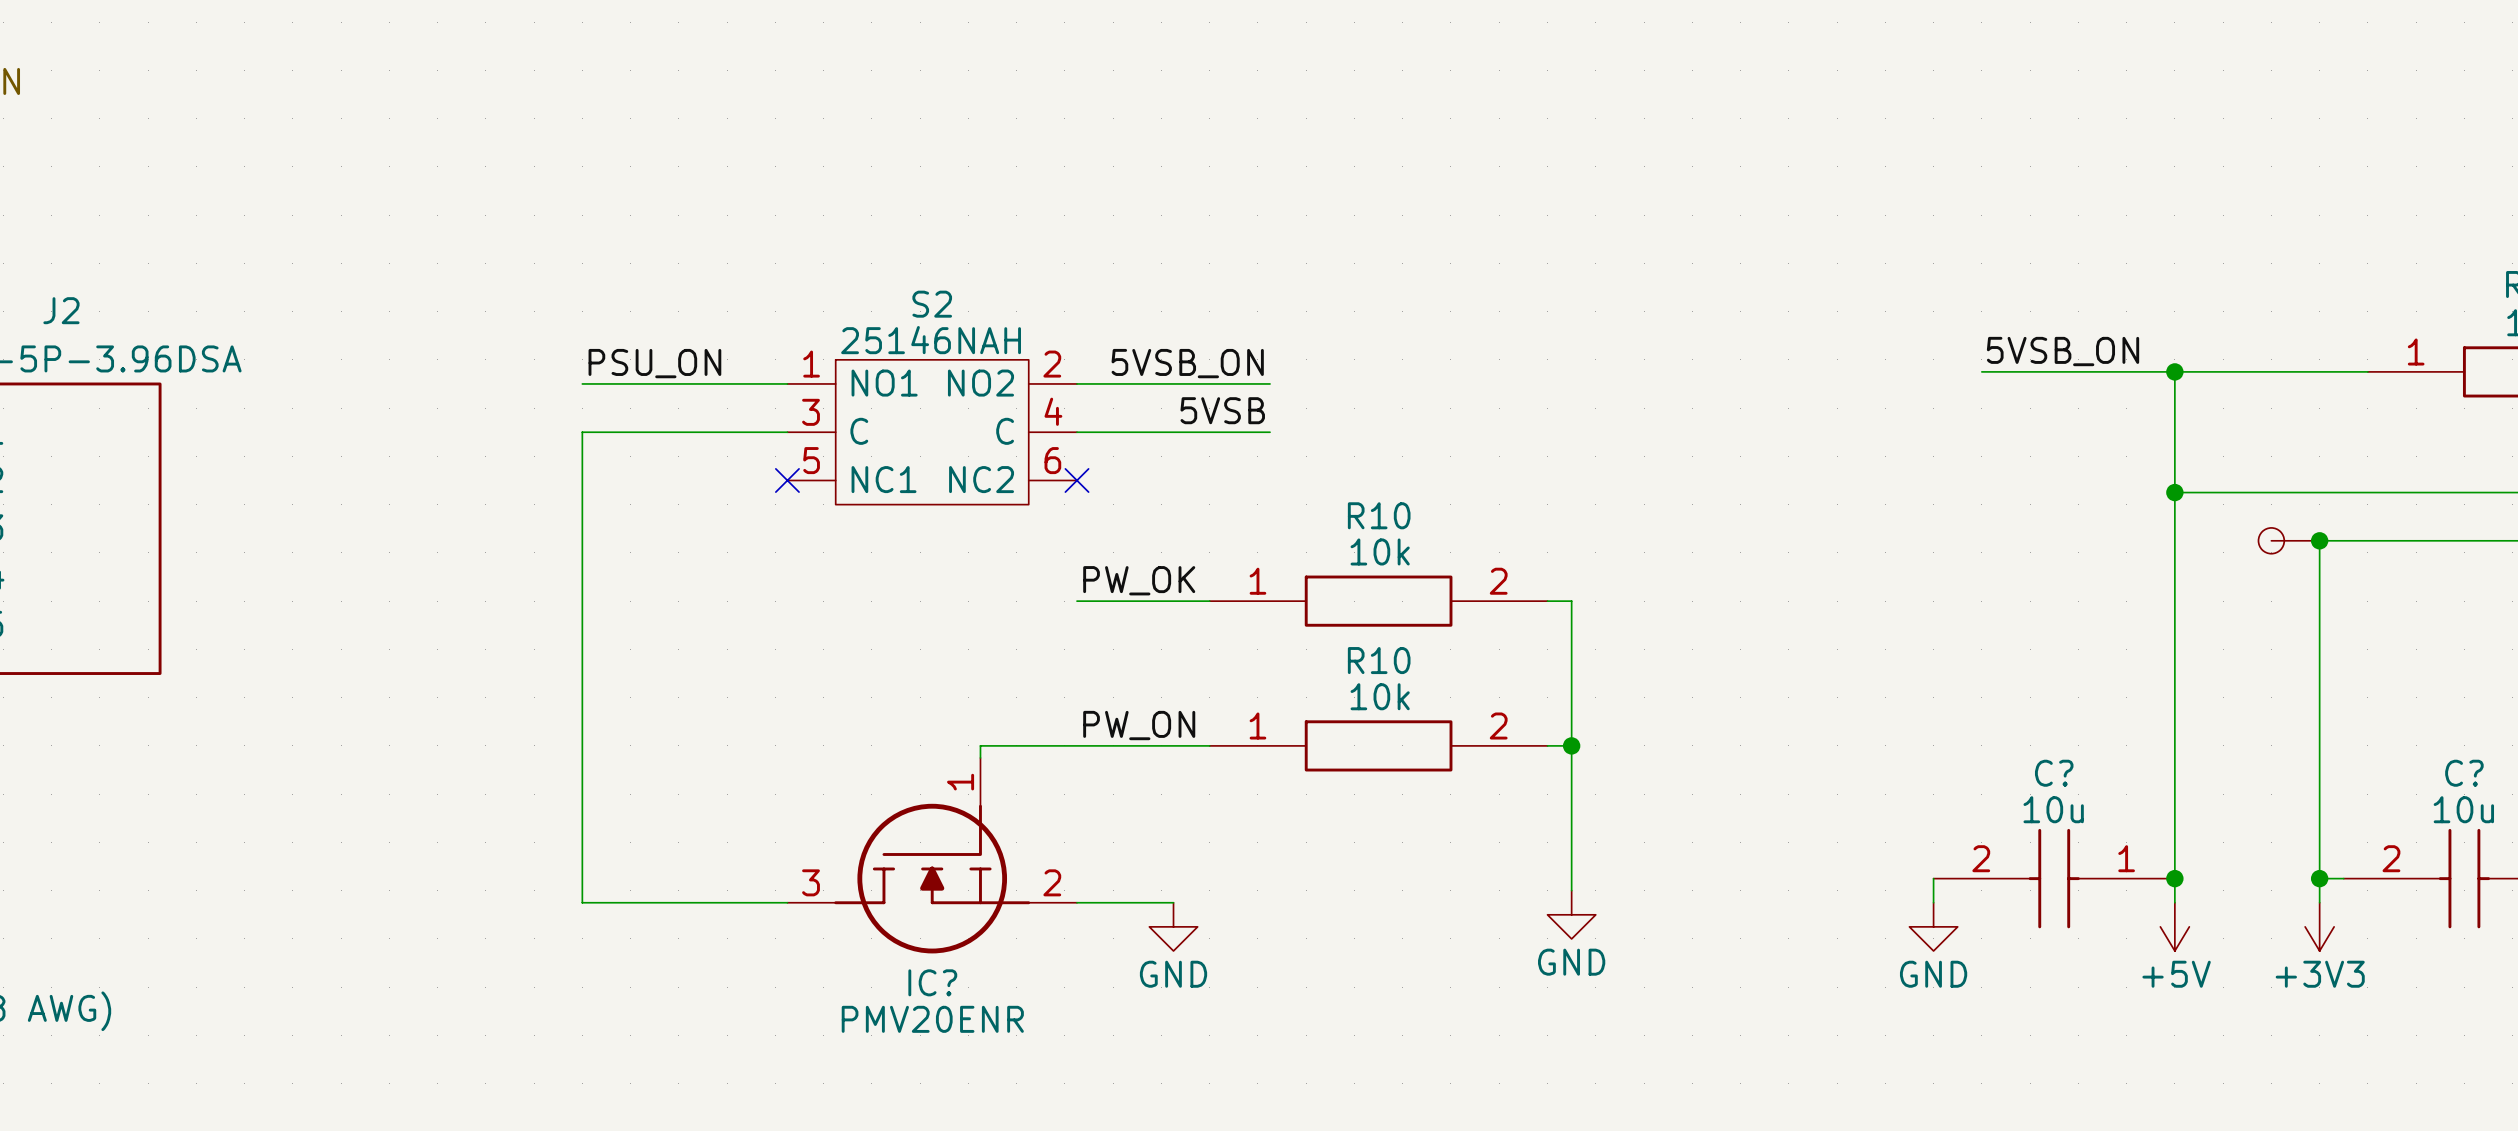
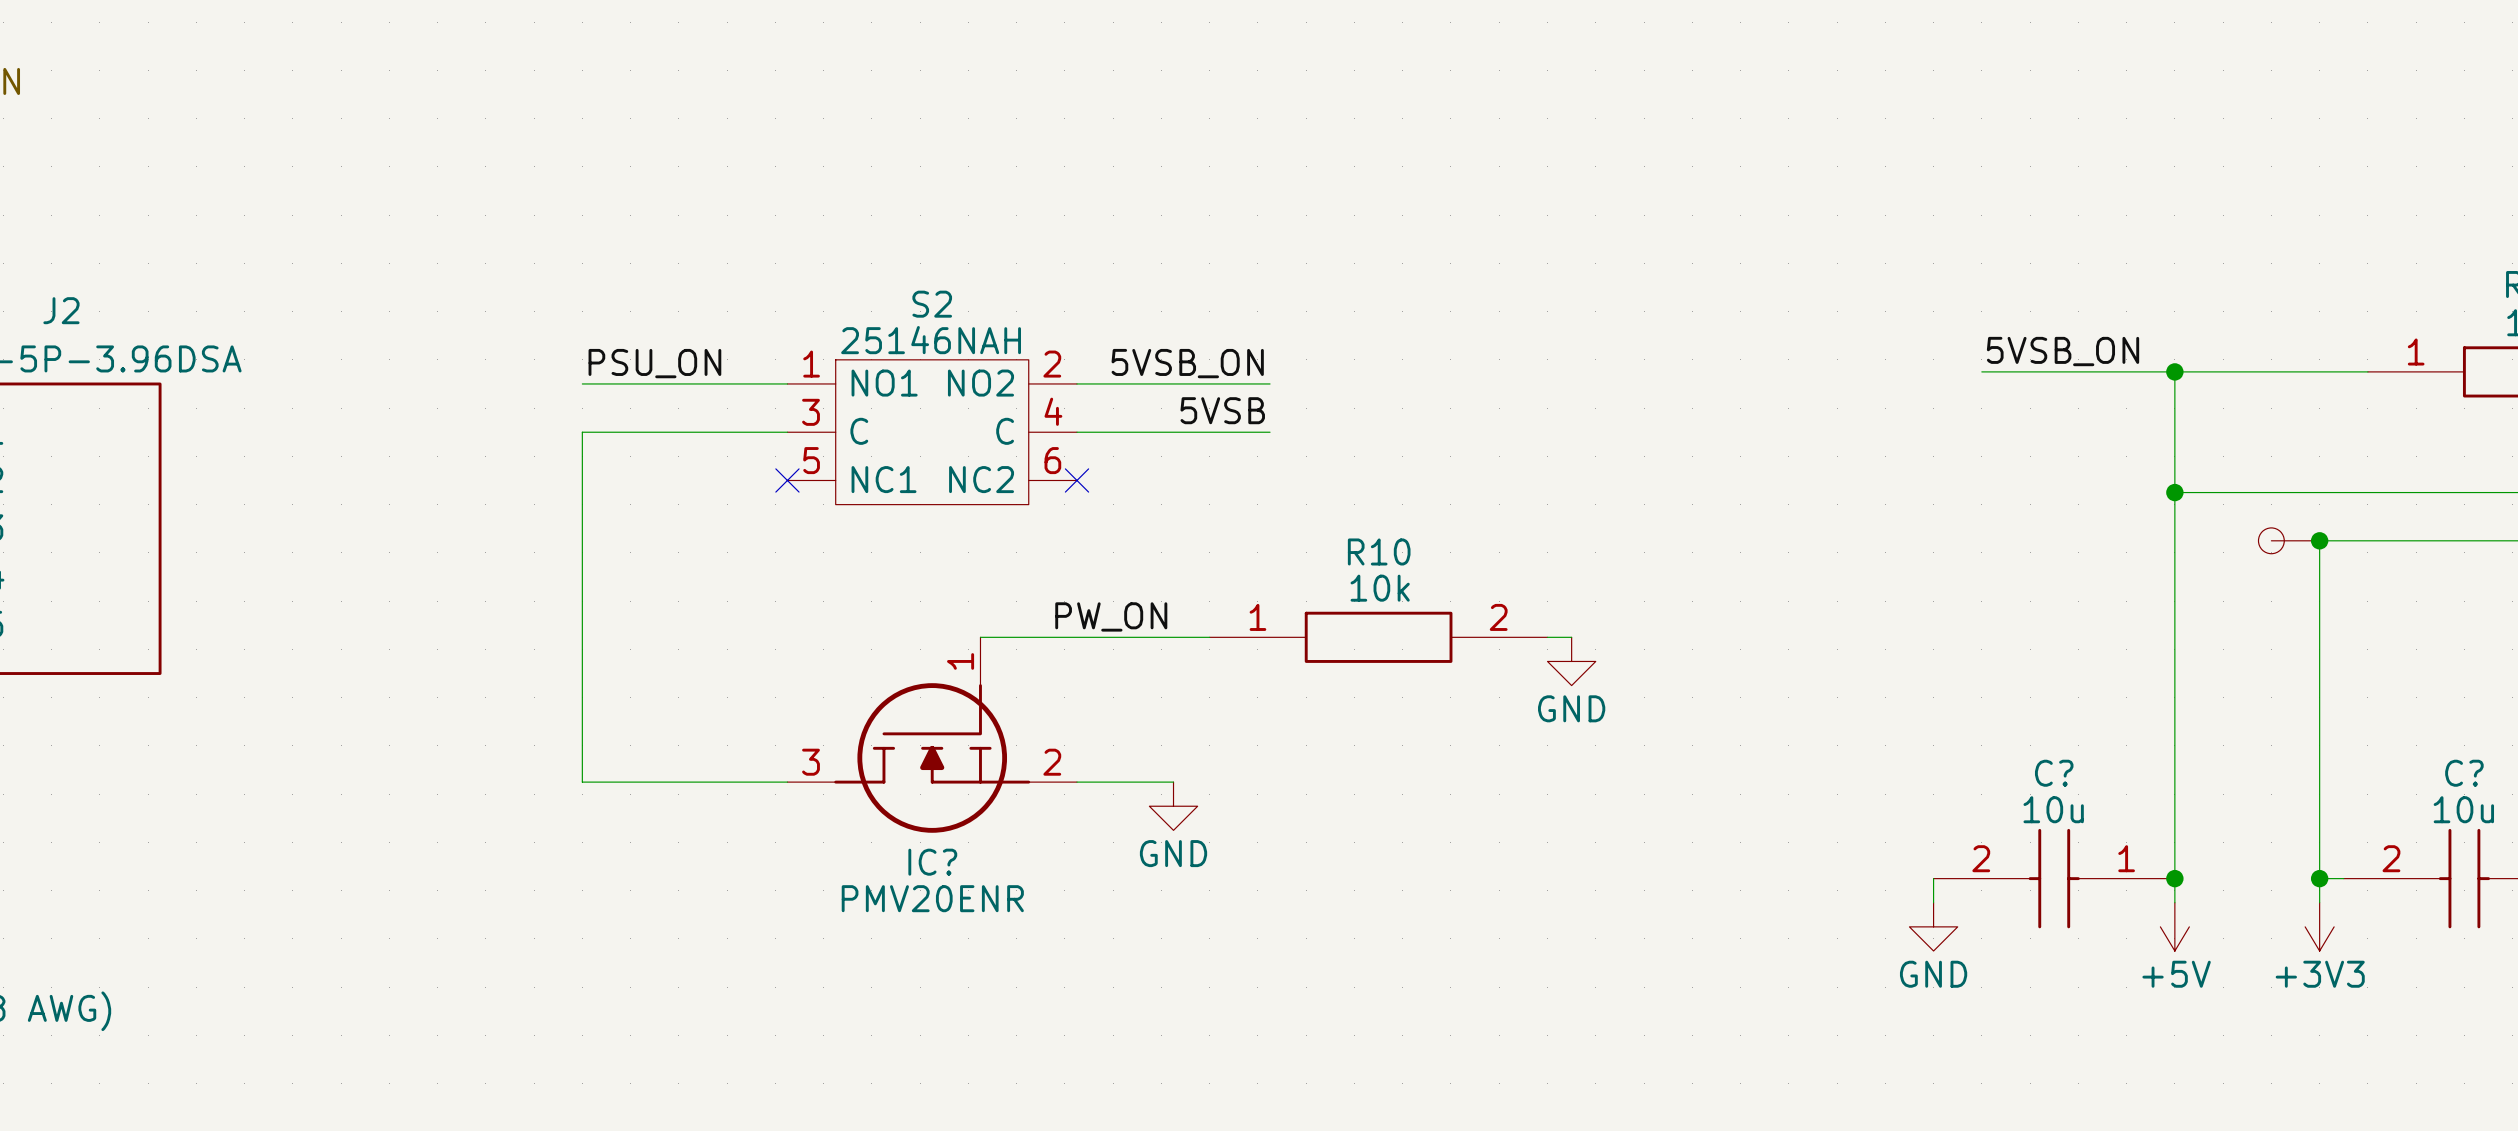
label: PW_OK (1139, 580) -> none
wire: (1076, 601) (1209, 601) -> none
R10 position: (1378, 601) -> (1378, 637)
wire: (1547, 601) (1571, 601) (1571, 890) -> none
wire: none -> (980, 637) (1209, 637)
power symbol: none -> GND (1571, 661)
label position: PW_ON (1139, 725) -> PW_ON (1111, 616)
wire: (1209, 745) (980, 745) (980, 757) -> none
R10: 10k (1378, 745) -> none
wire: (1547, 745) (1571, 745) -> (1547, 637) (1571, 637)
junction: (1571, 745) -> none
wire: (582, 782) (582, 902) (787, 902) -> (582, 782) (787, 782)
IC? position: (932, 855) -> (932, 735)
wire: (1076, 902) (1173, 902) -> (1076, 782) (1173, 782)
power symbol: GND (1571, 914) -> none
power symbol position: GND (1173, 926) -> GND (1173, 806)

